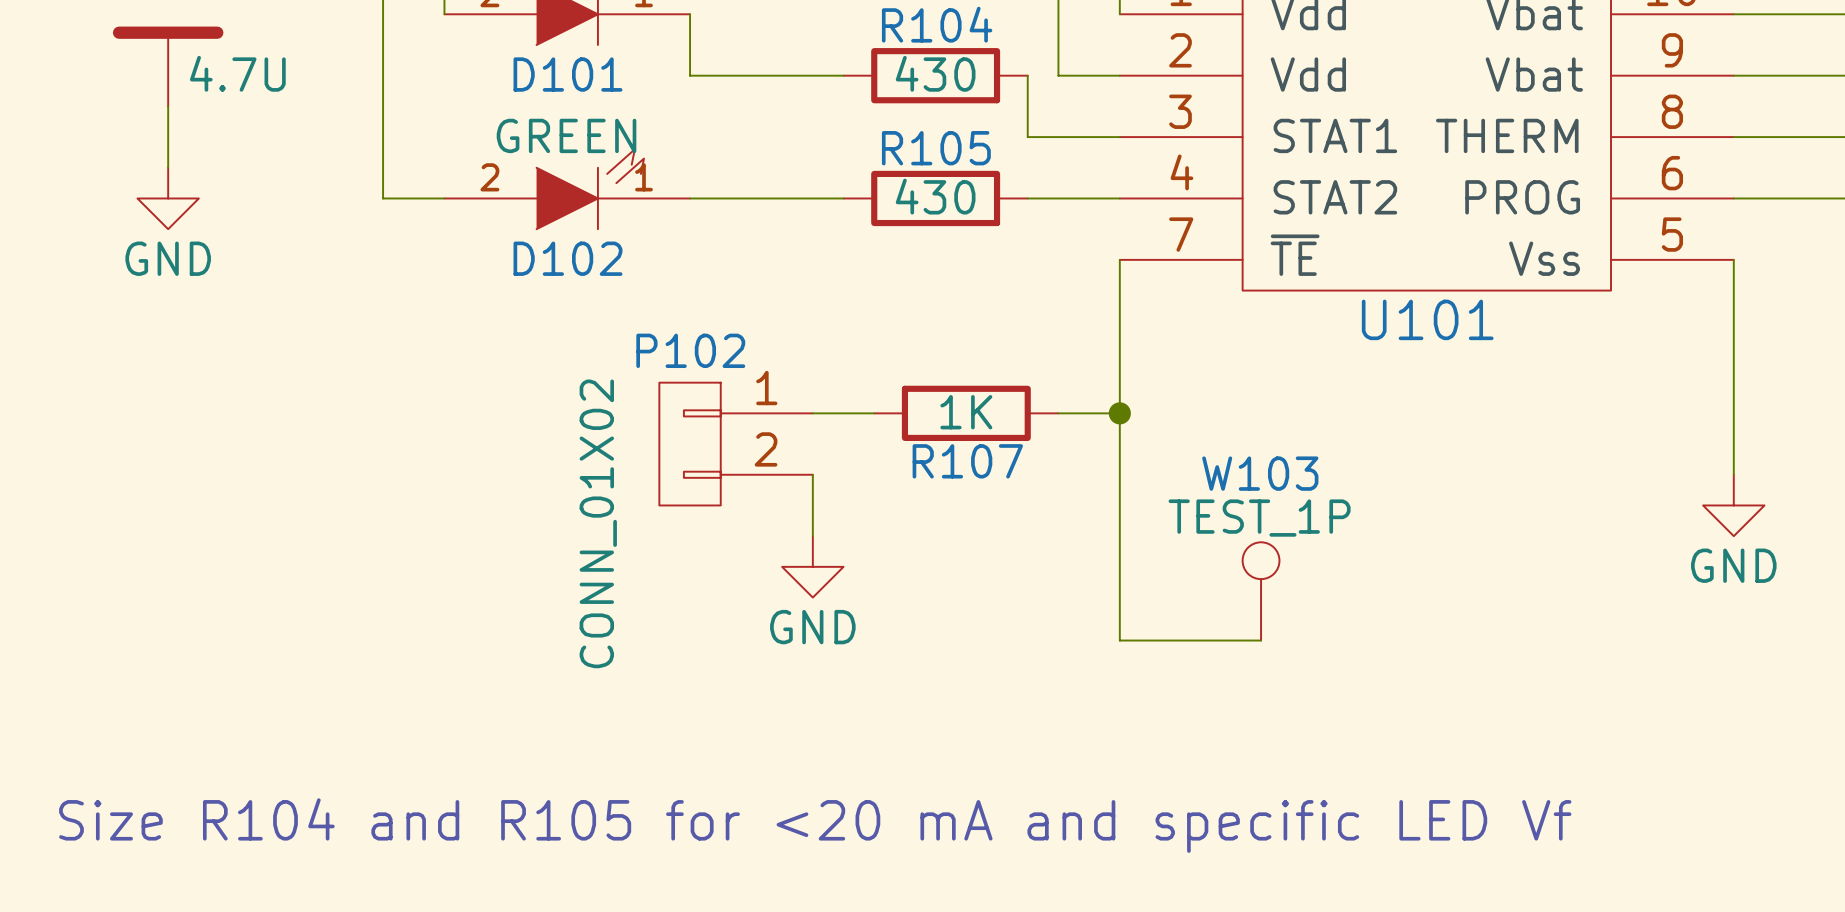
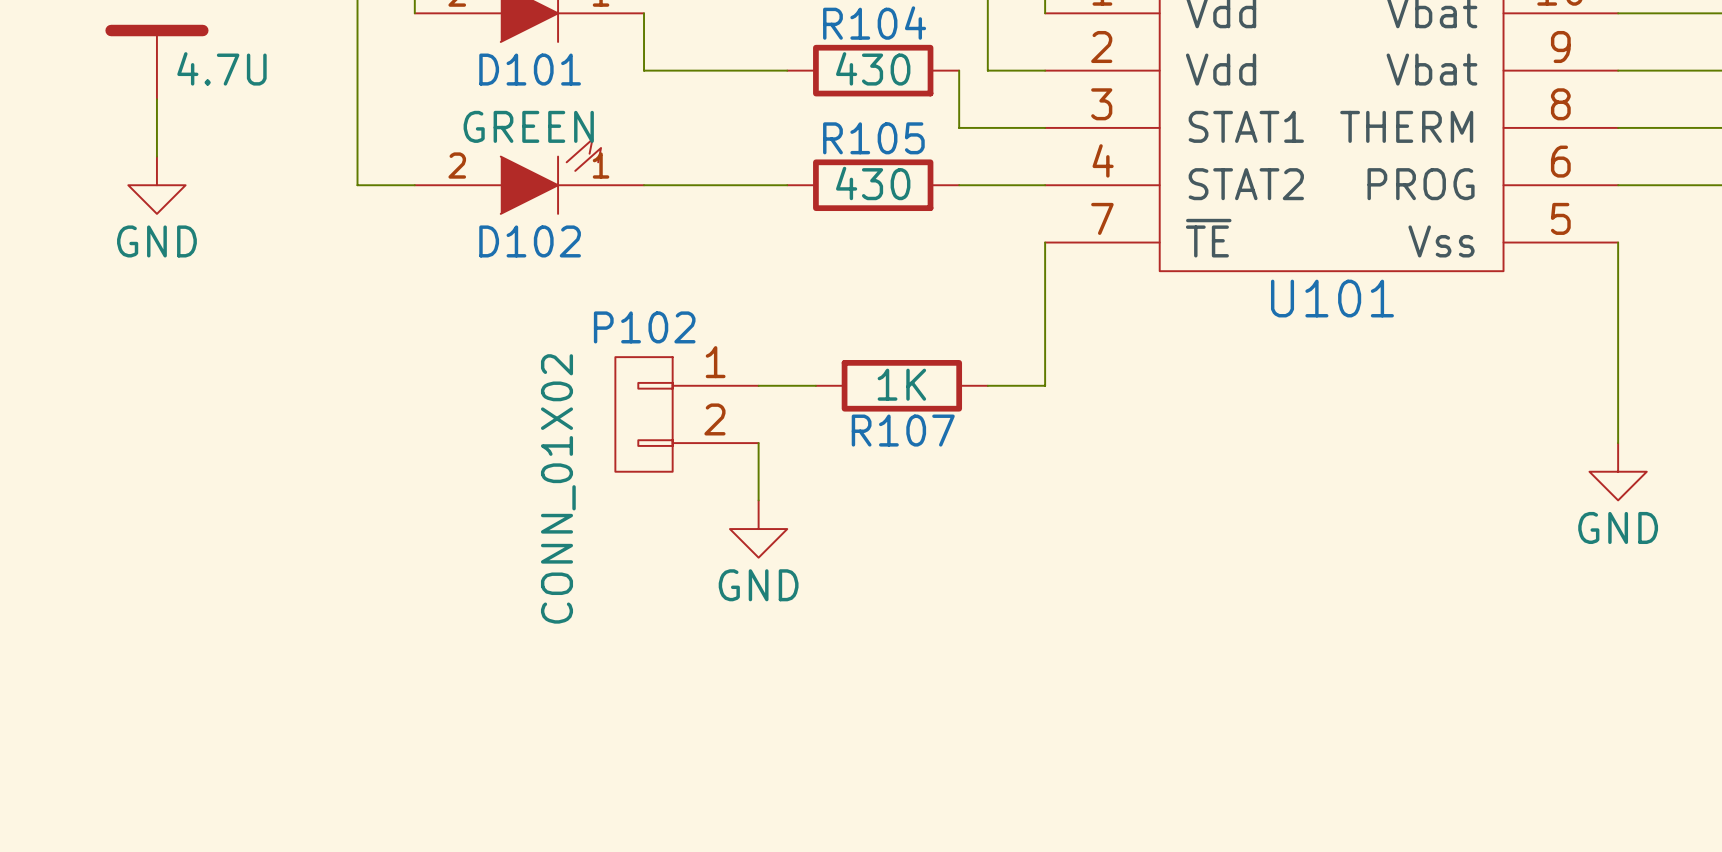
wire: (1119, 413) (1119, 640) (1261, 640) -> none
junction: (1119, 413) -> none
W103: TEST_1P (1261, 591) -> none
text: Size R104 and R105 for <20 mA and specific LED Vf (815, 825) -> none

